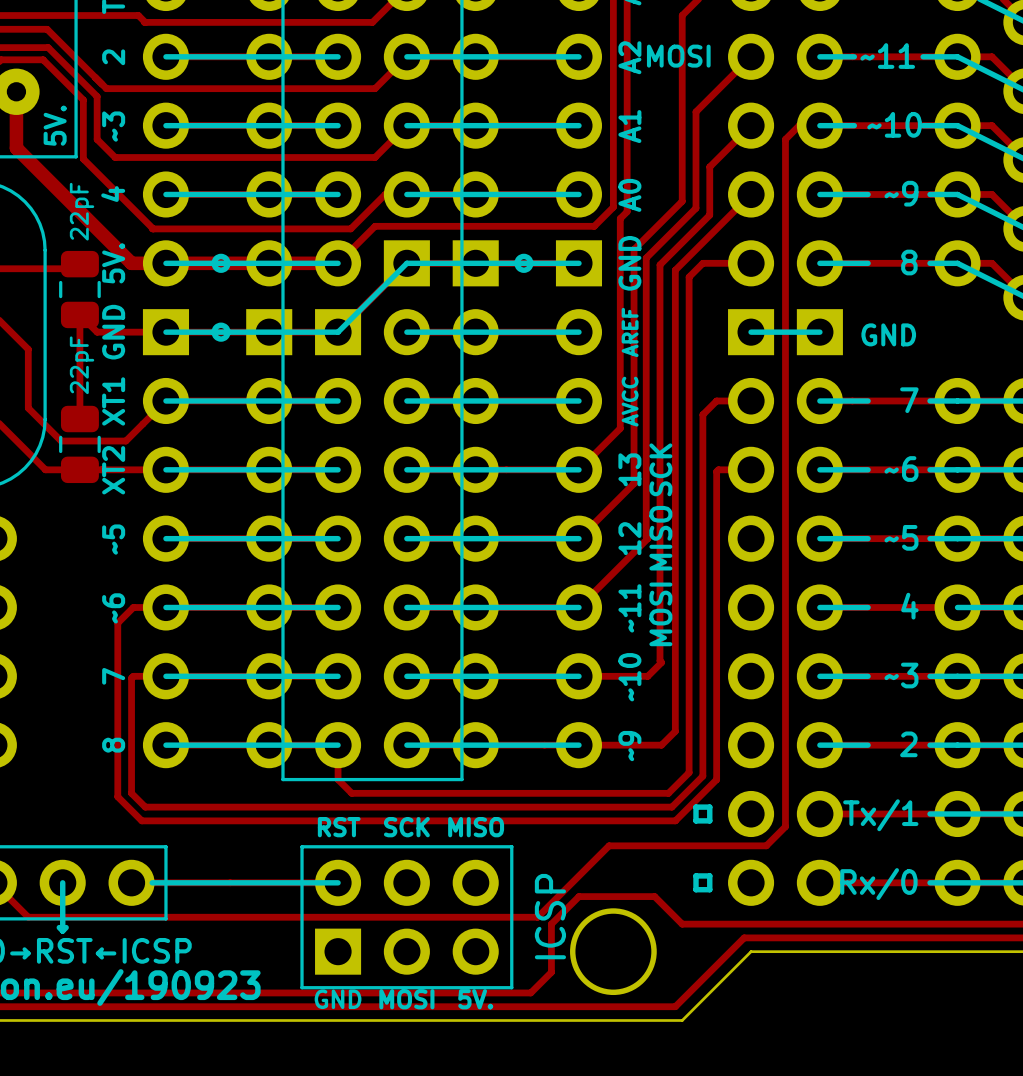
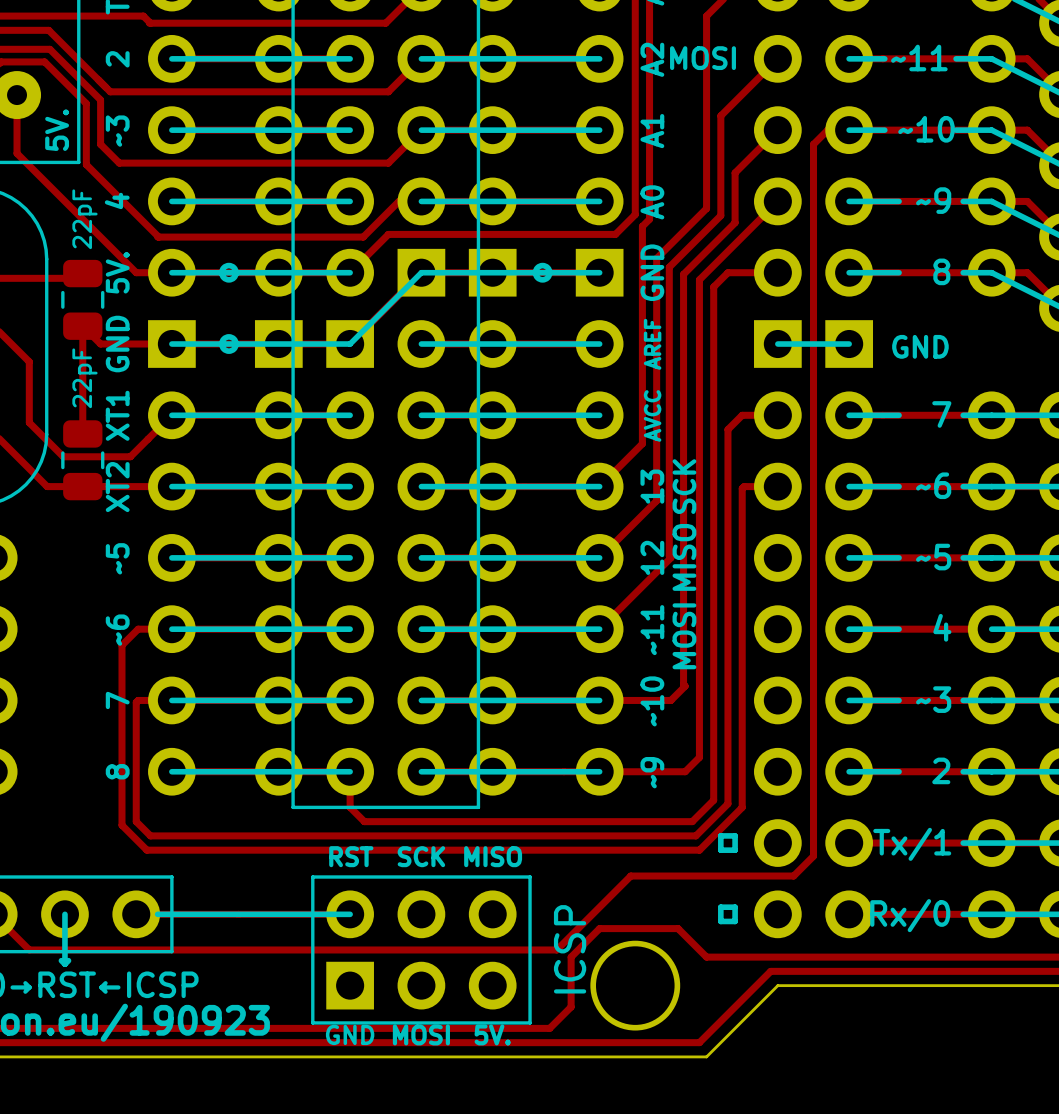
track width: thick (16, 91) (16, 148) (131, 263) (338, 263) -> thin (17, 95) (17, 153) (136, 272) (350, 272)

